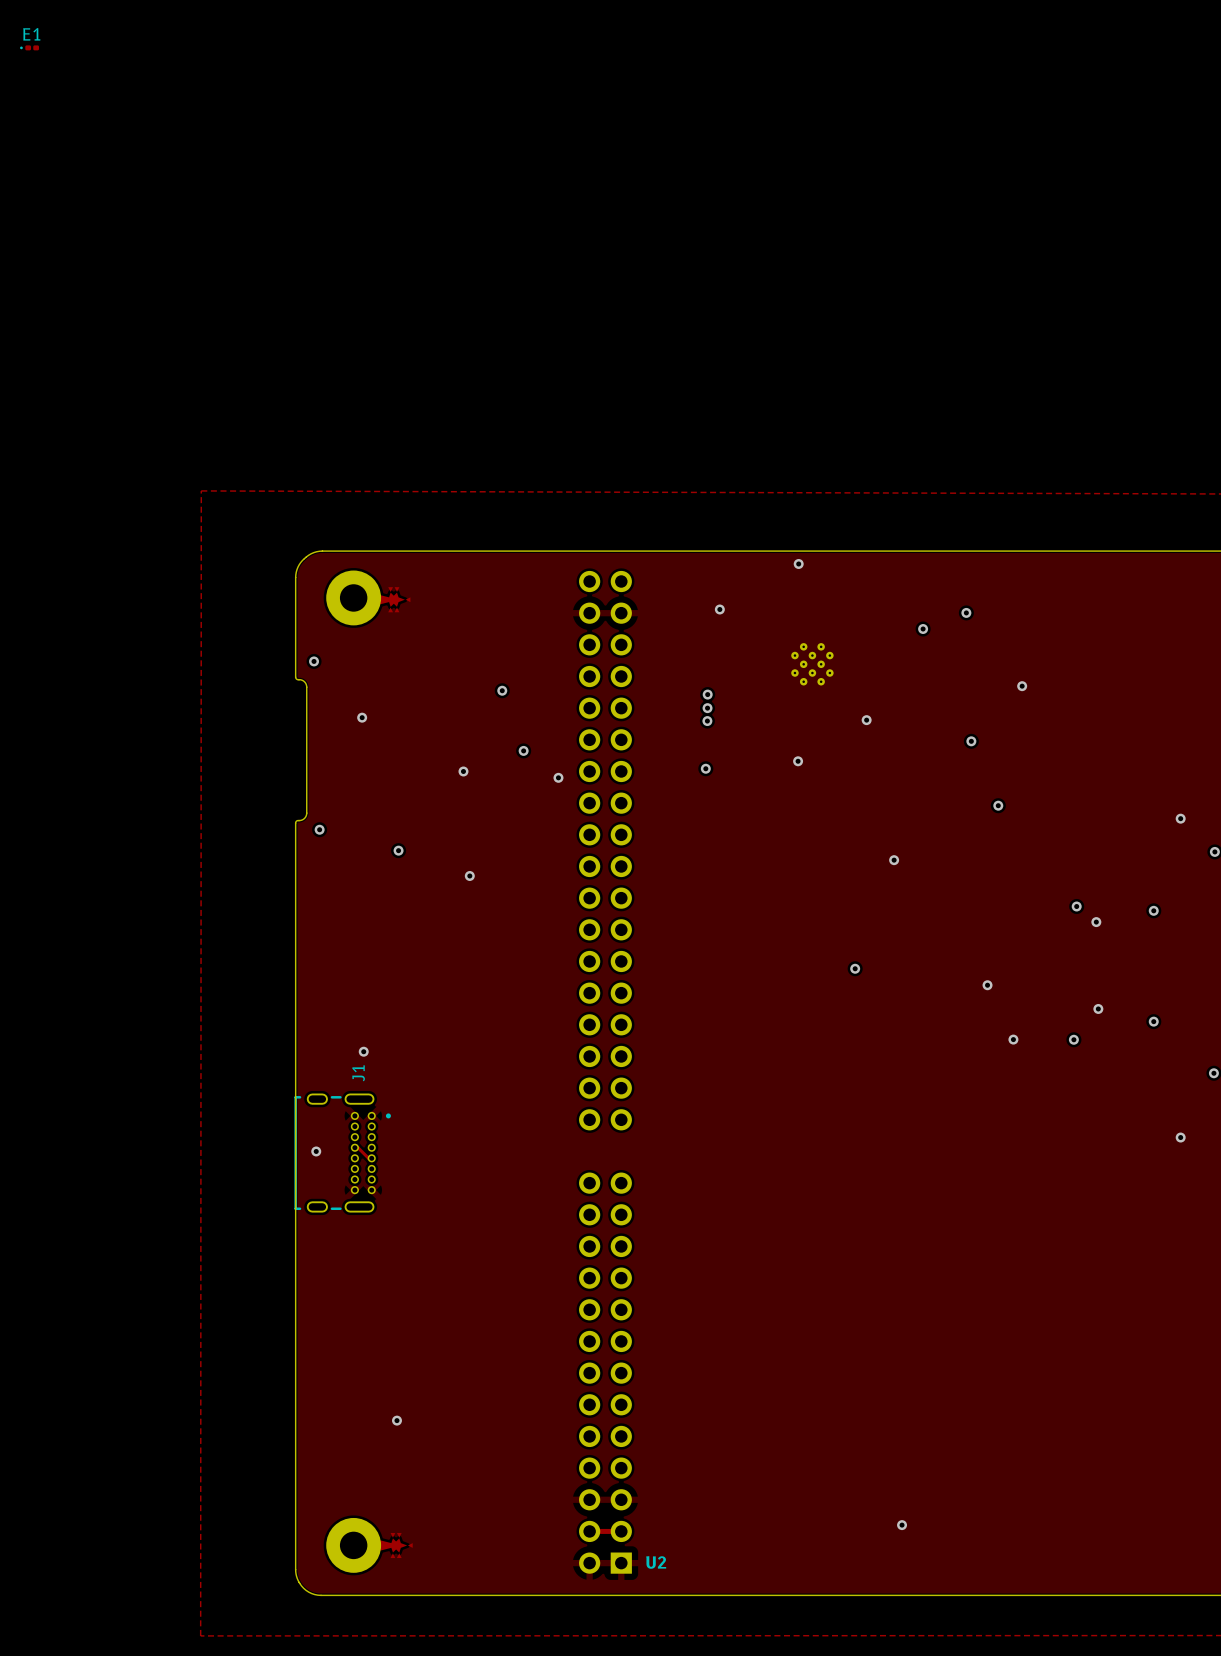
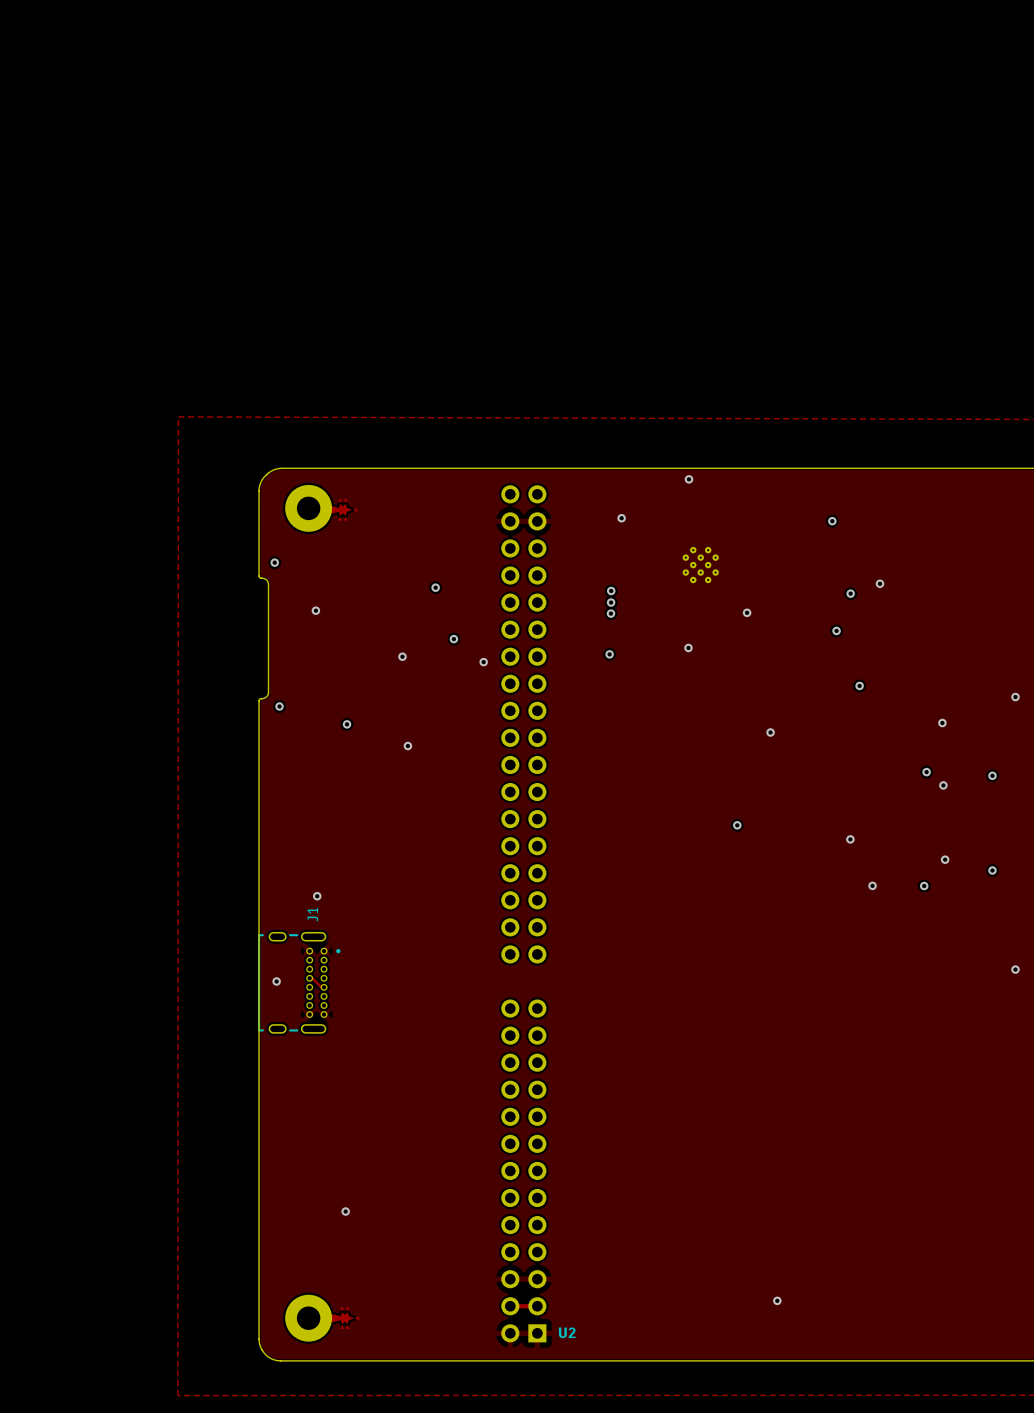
E1: (29, 47) -> none
via: (923, 629) -> none
via: none -> (850, 593)
via: none -> (942, 723)

